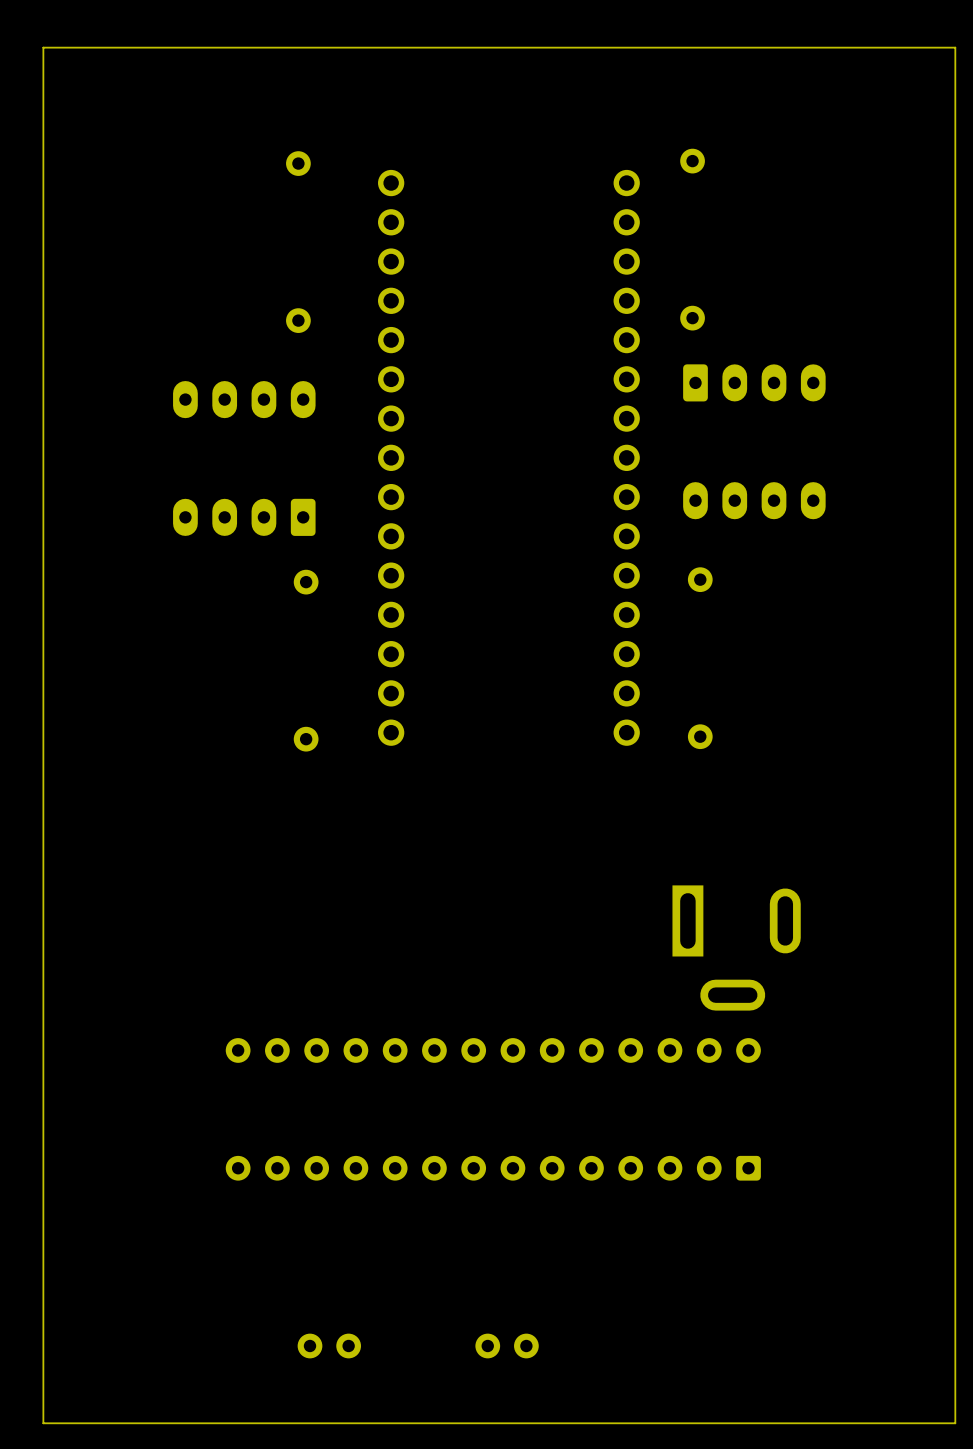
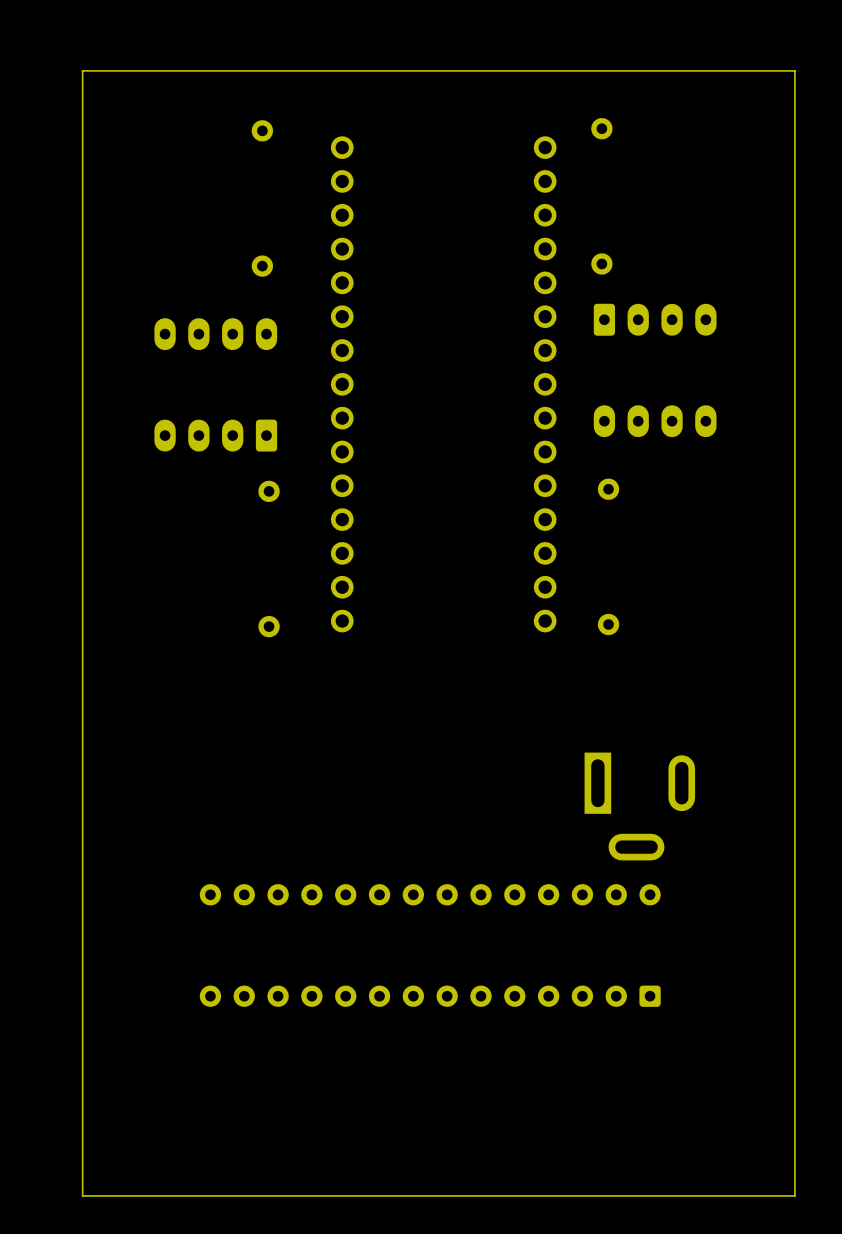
board edge: (955, 47) (43, 47) (43, 1423) (955, 1423) (955, 47) -> (794, 70) (794, 1195) (82, 1195) (82, 70) (794, 70)
part: (329, 1346) -> none
part: (507, 1346) -> none

